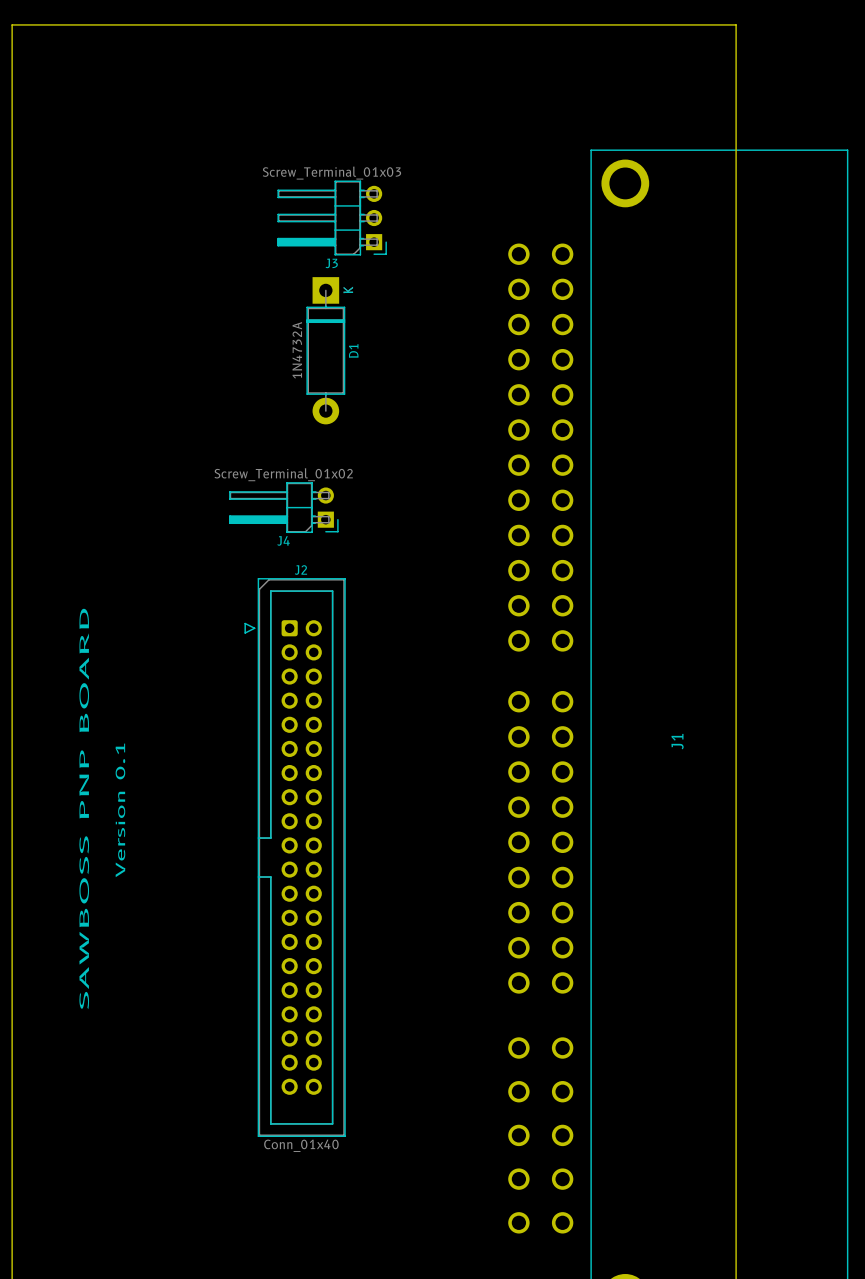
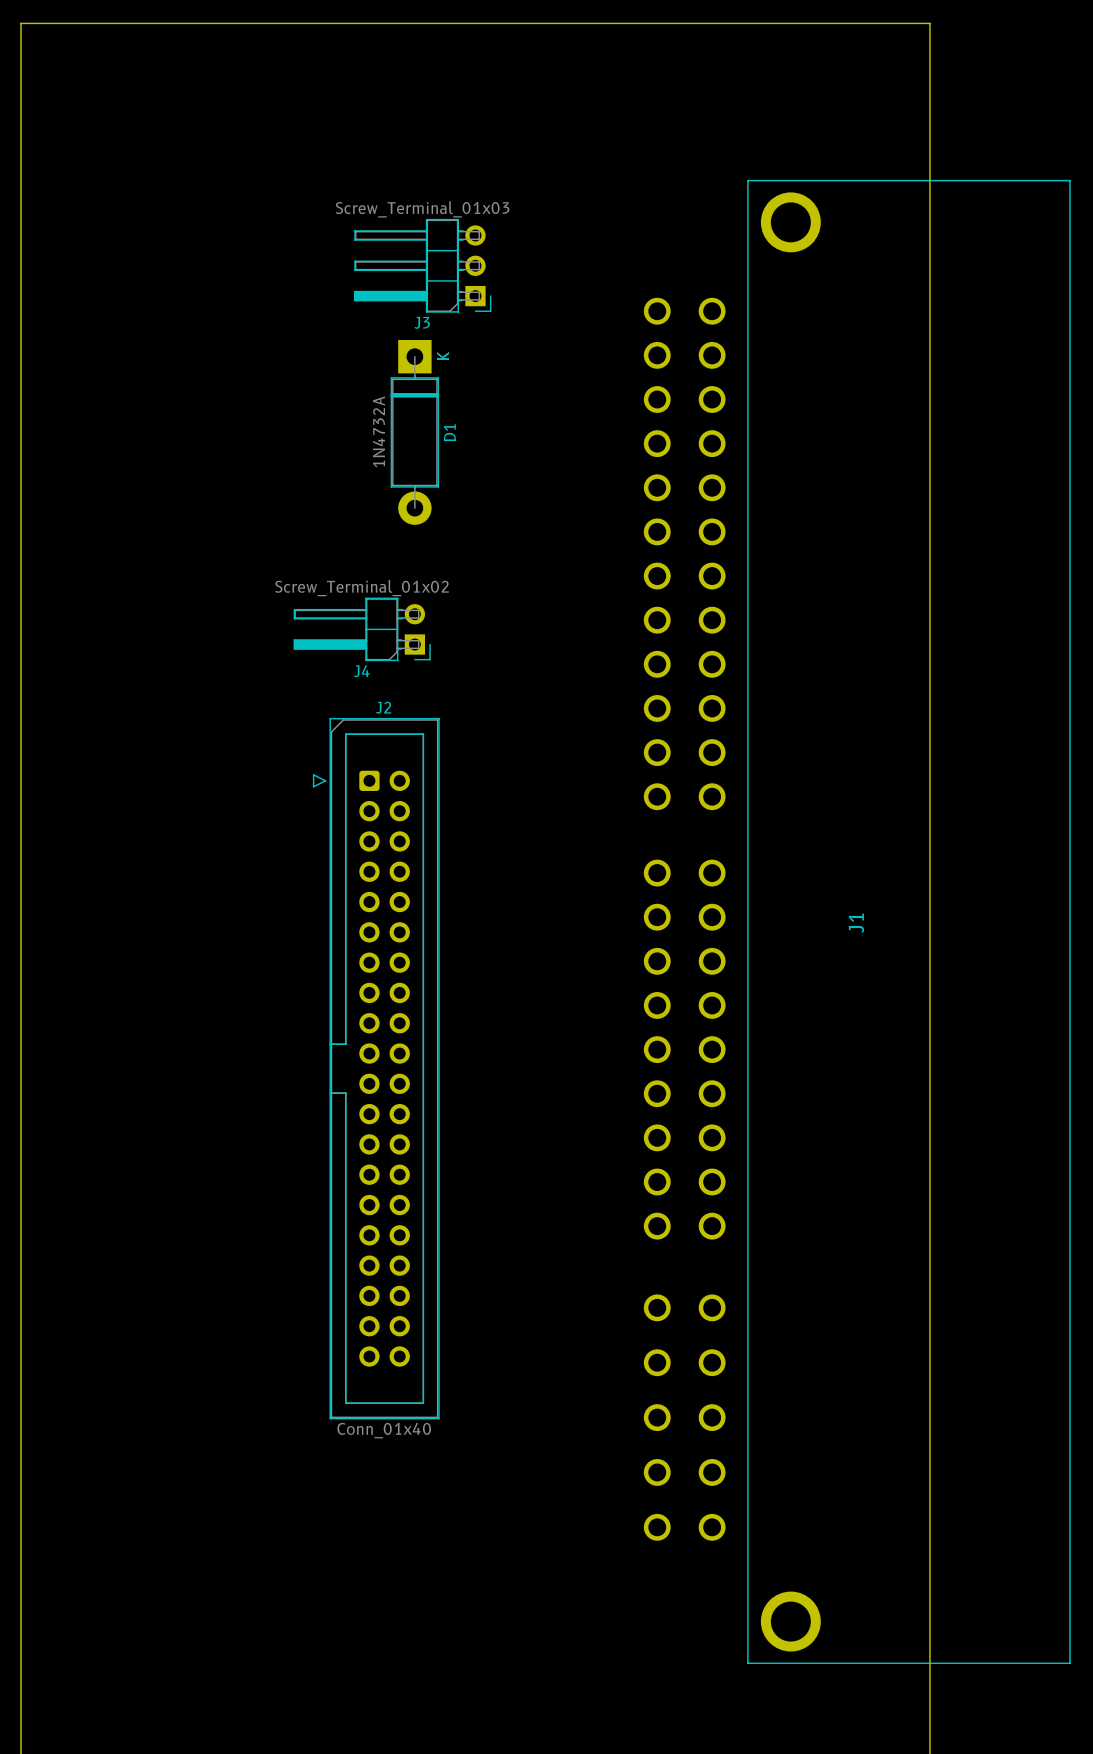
text: SAWBOSS PNP BOARD (84, 809) -> none
text: Version 0.1 (120, 810) -> none

